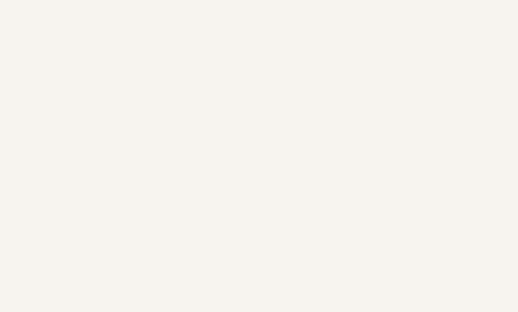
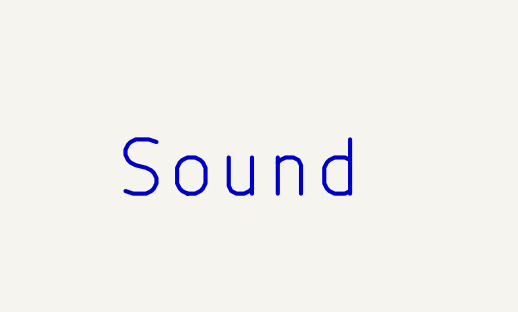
text: none -> Sound (237, 166)

